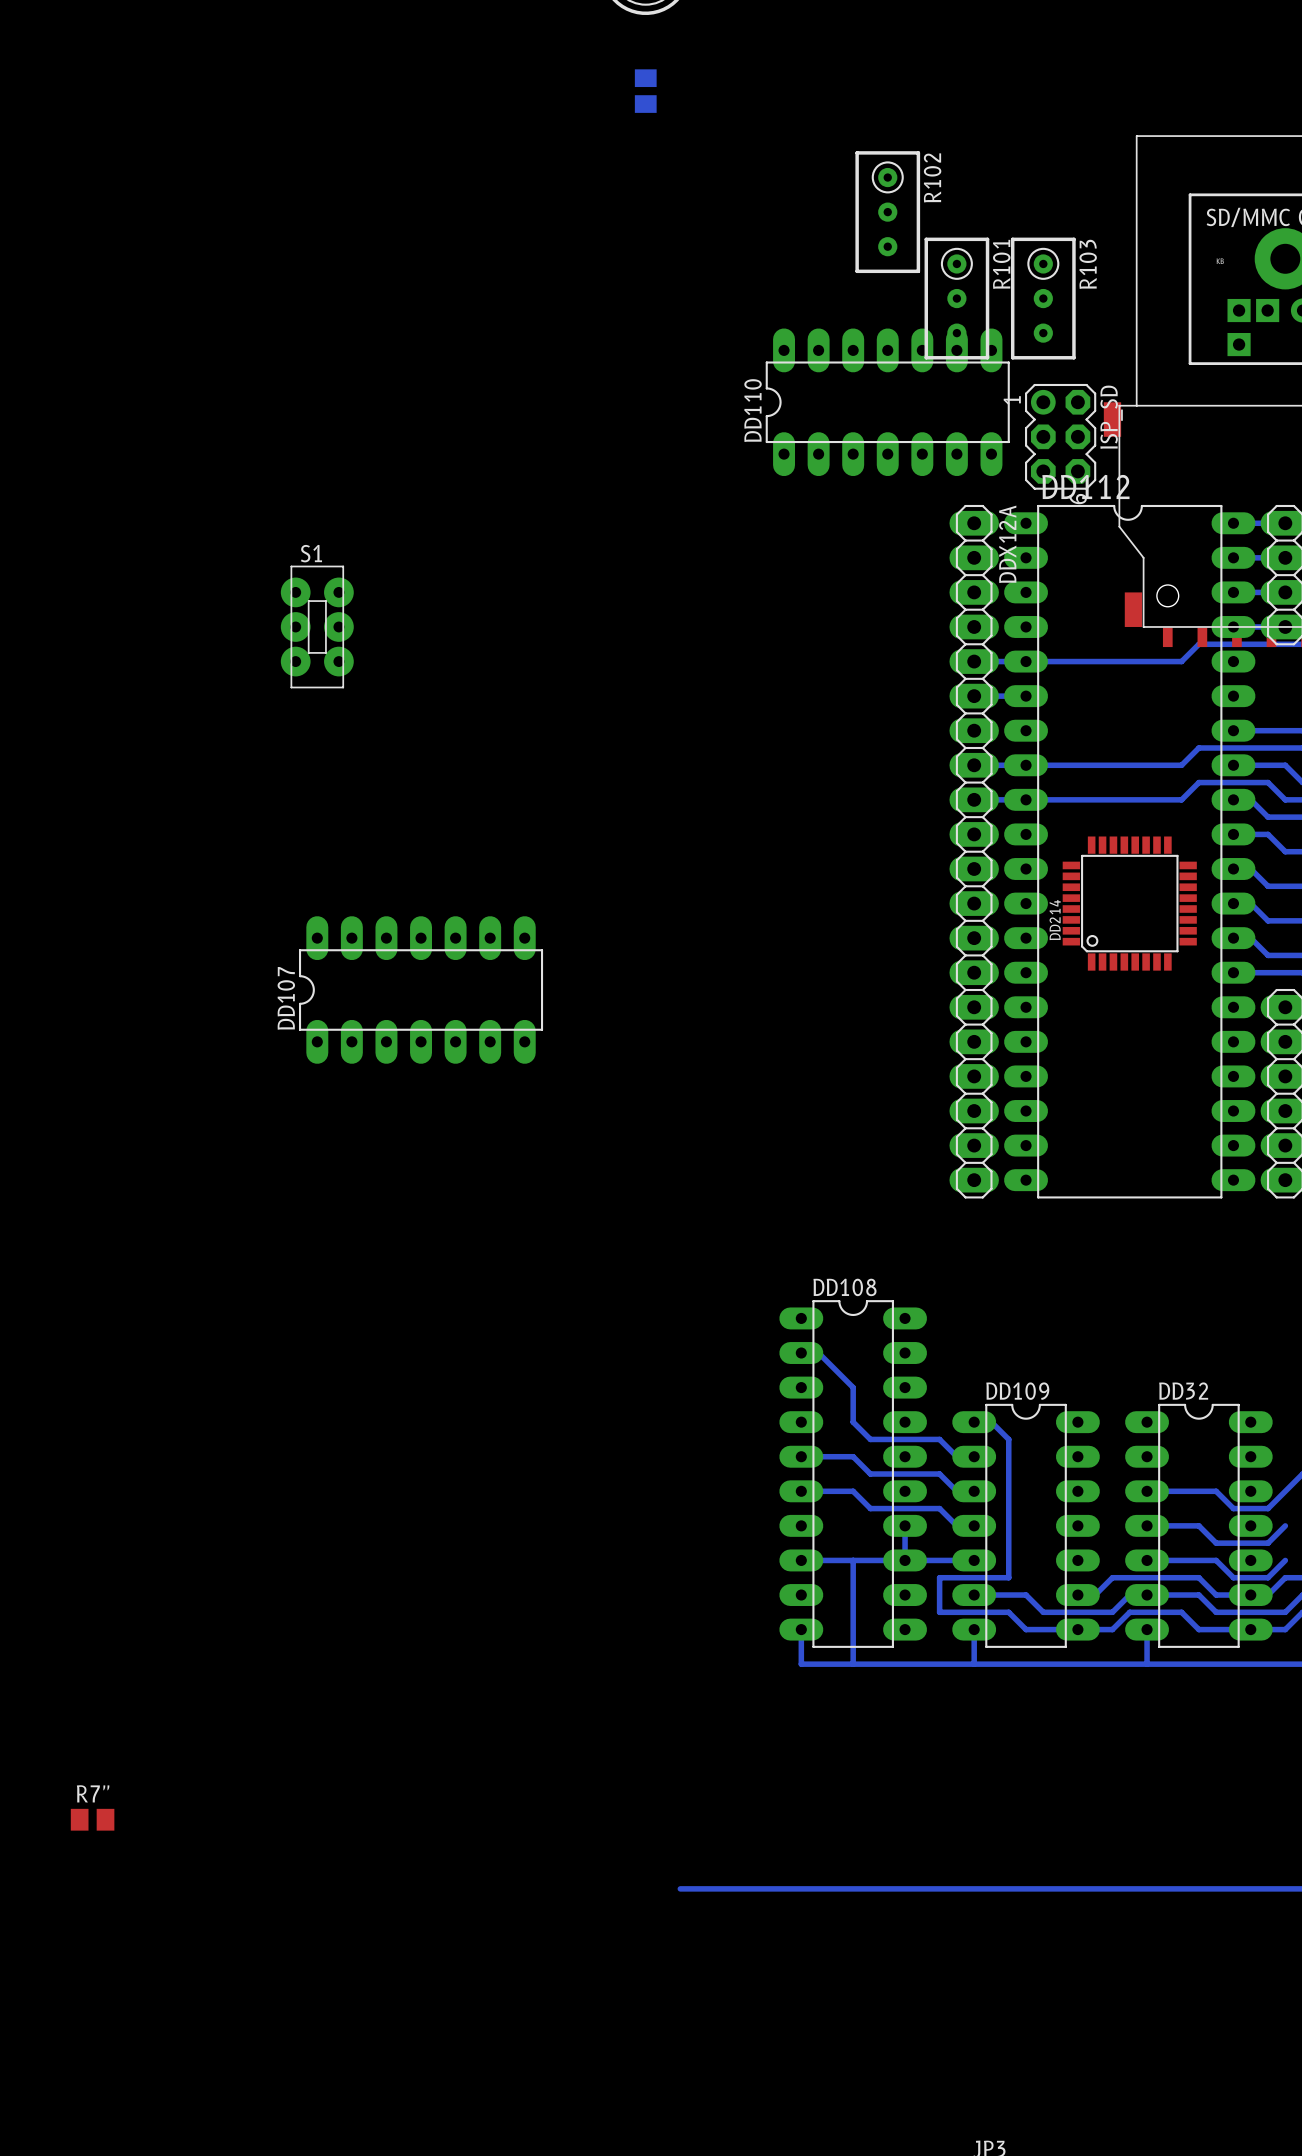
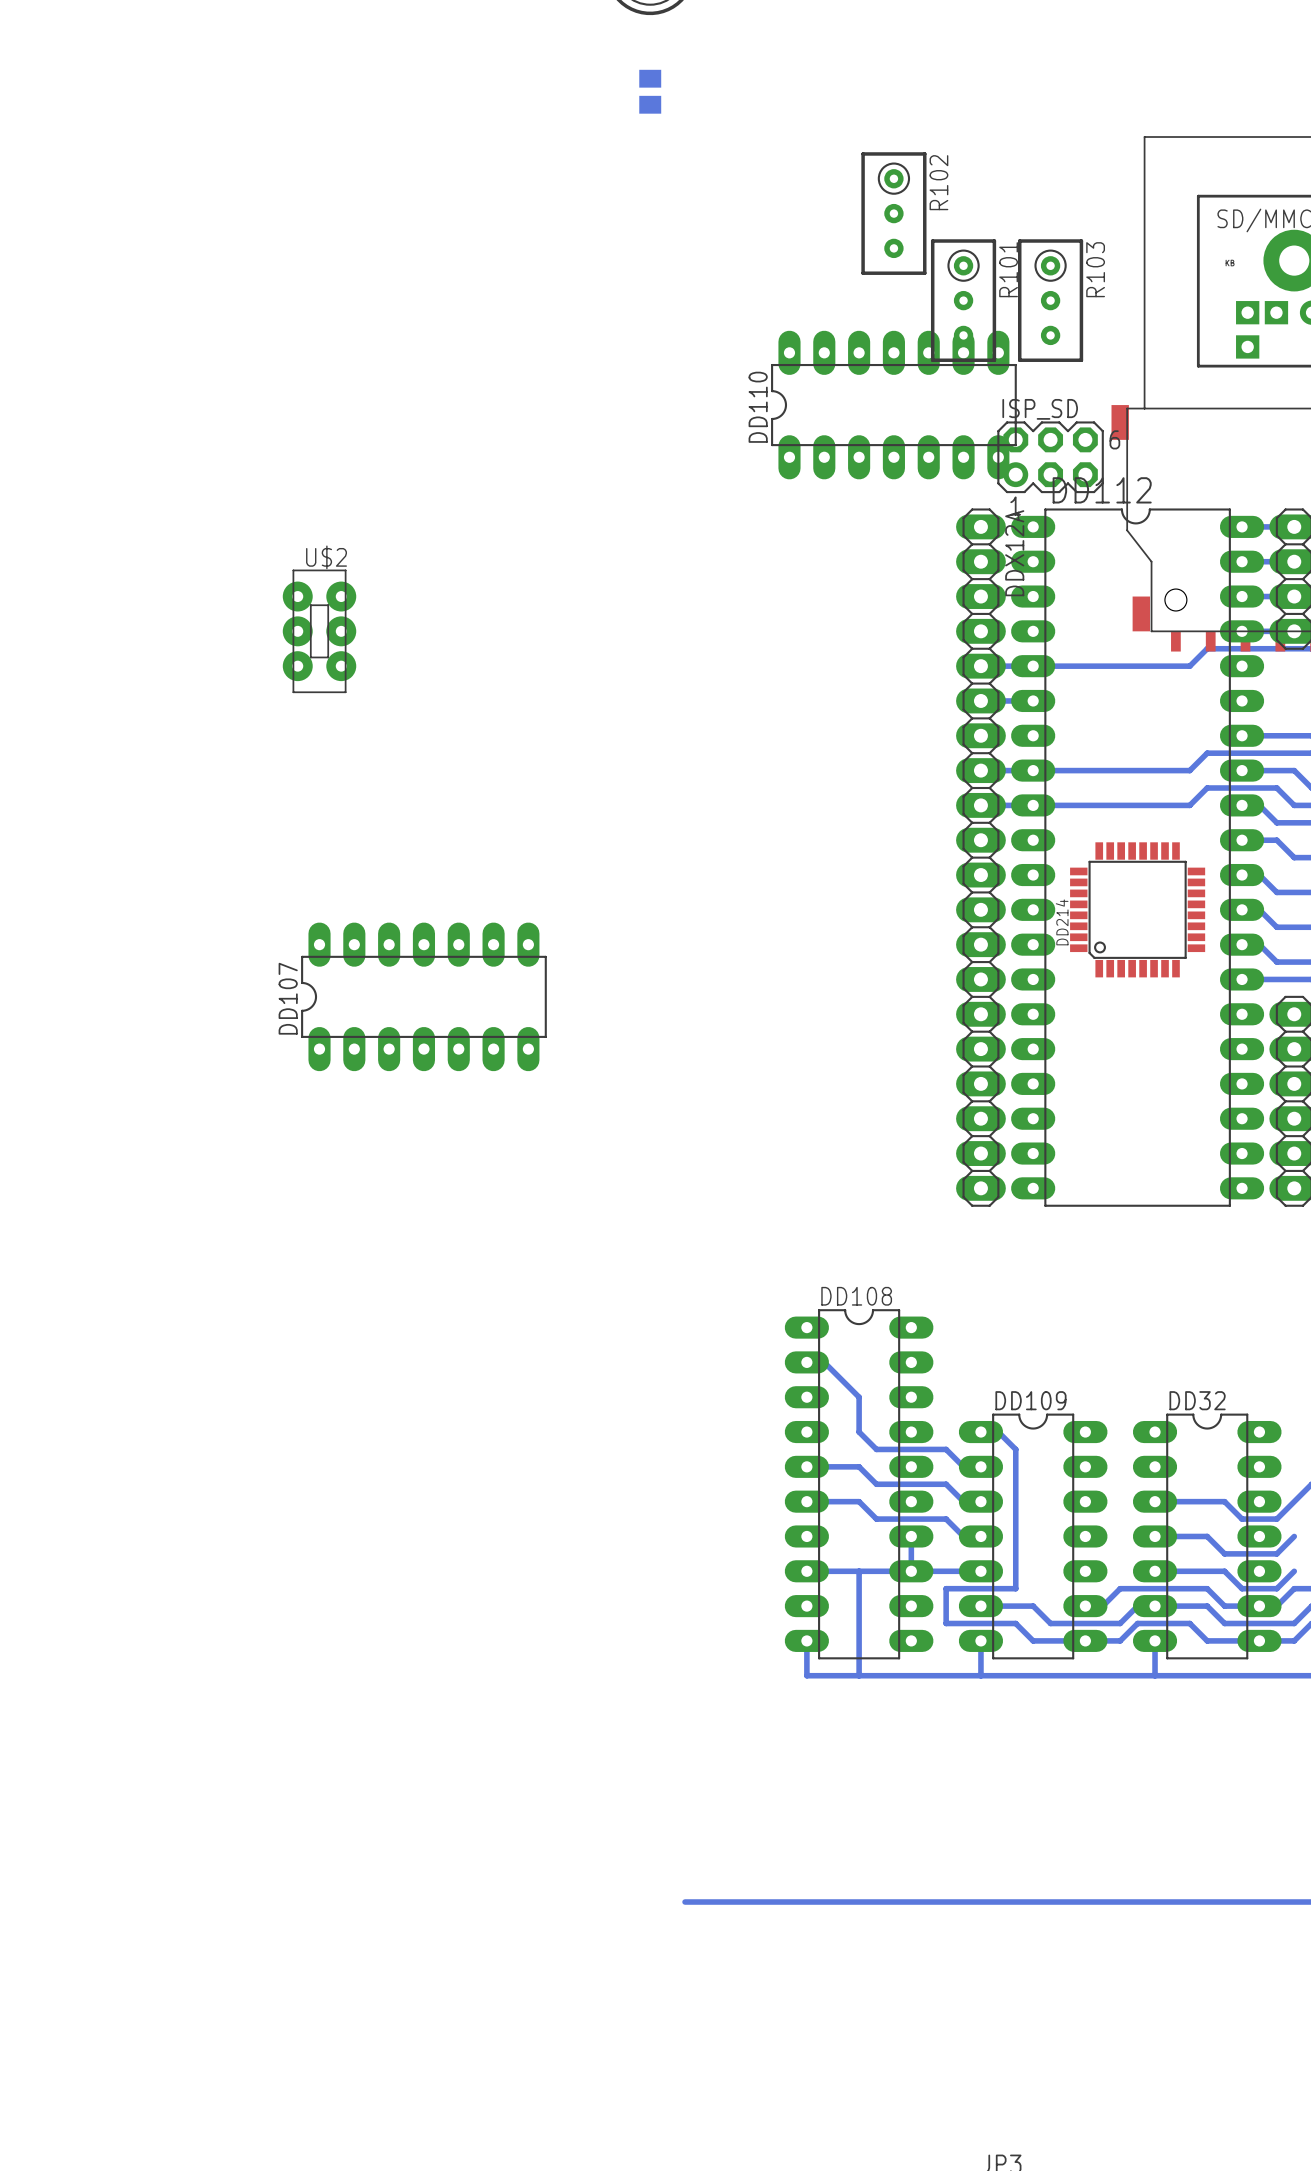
ISP_SD: (1060, 436) -> none
ISP_SD: none -> (1050, 457)
S1 name: S1 (311, 553) -> U$2 (326, 557)
R7'': (92, 1819) -> none

